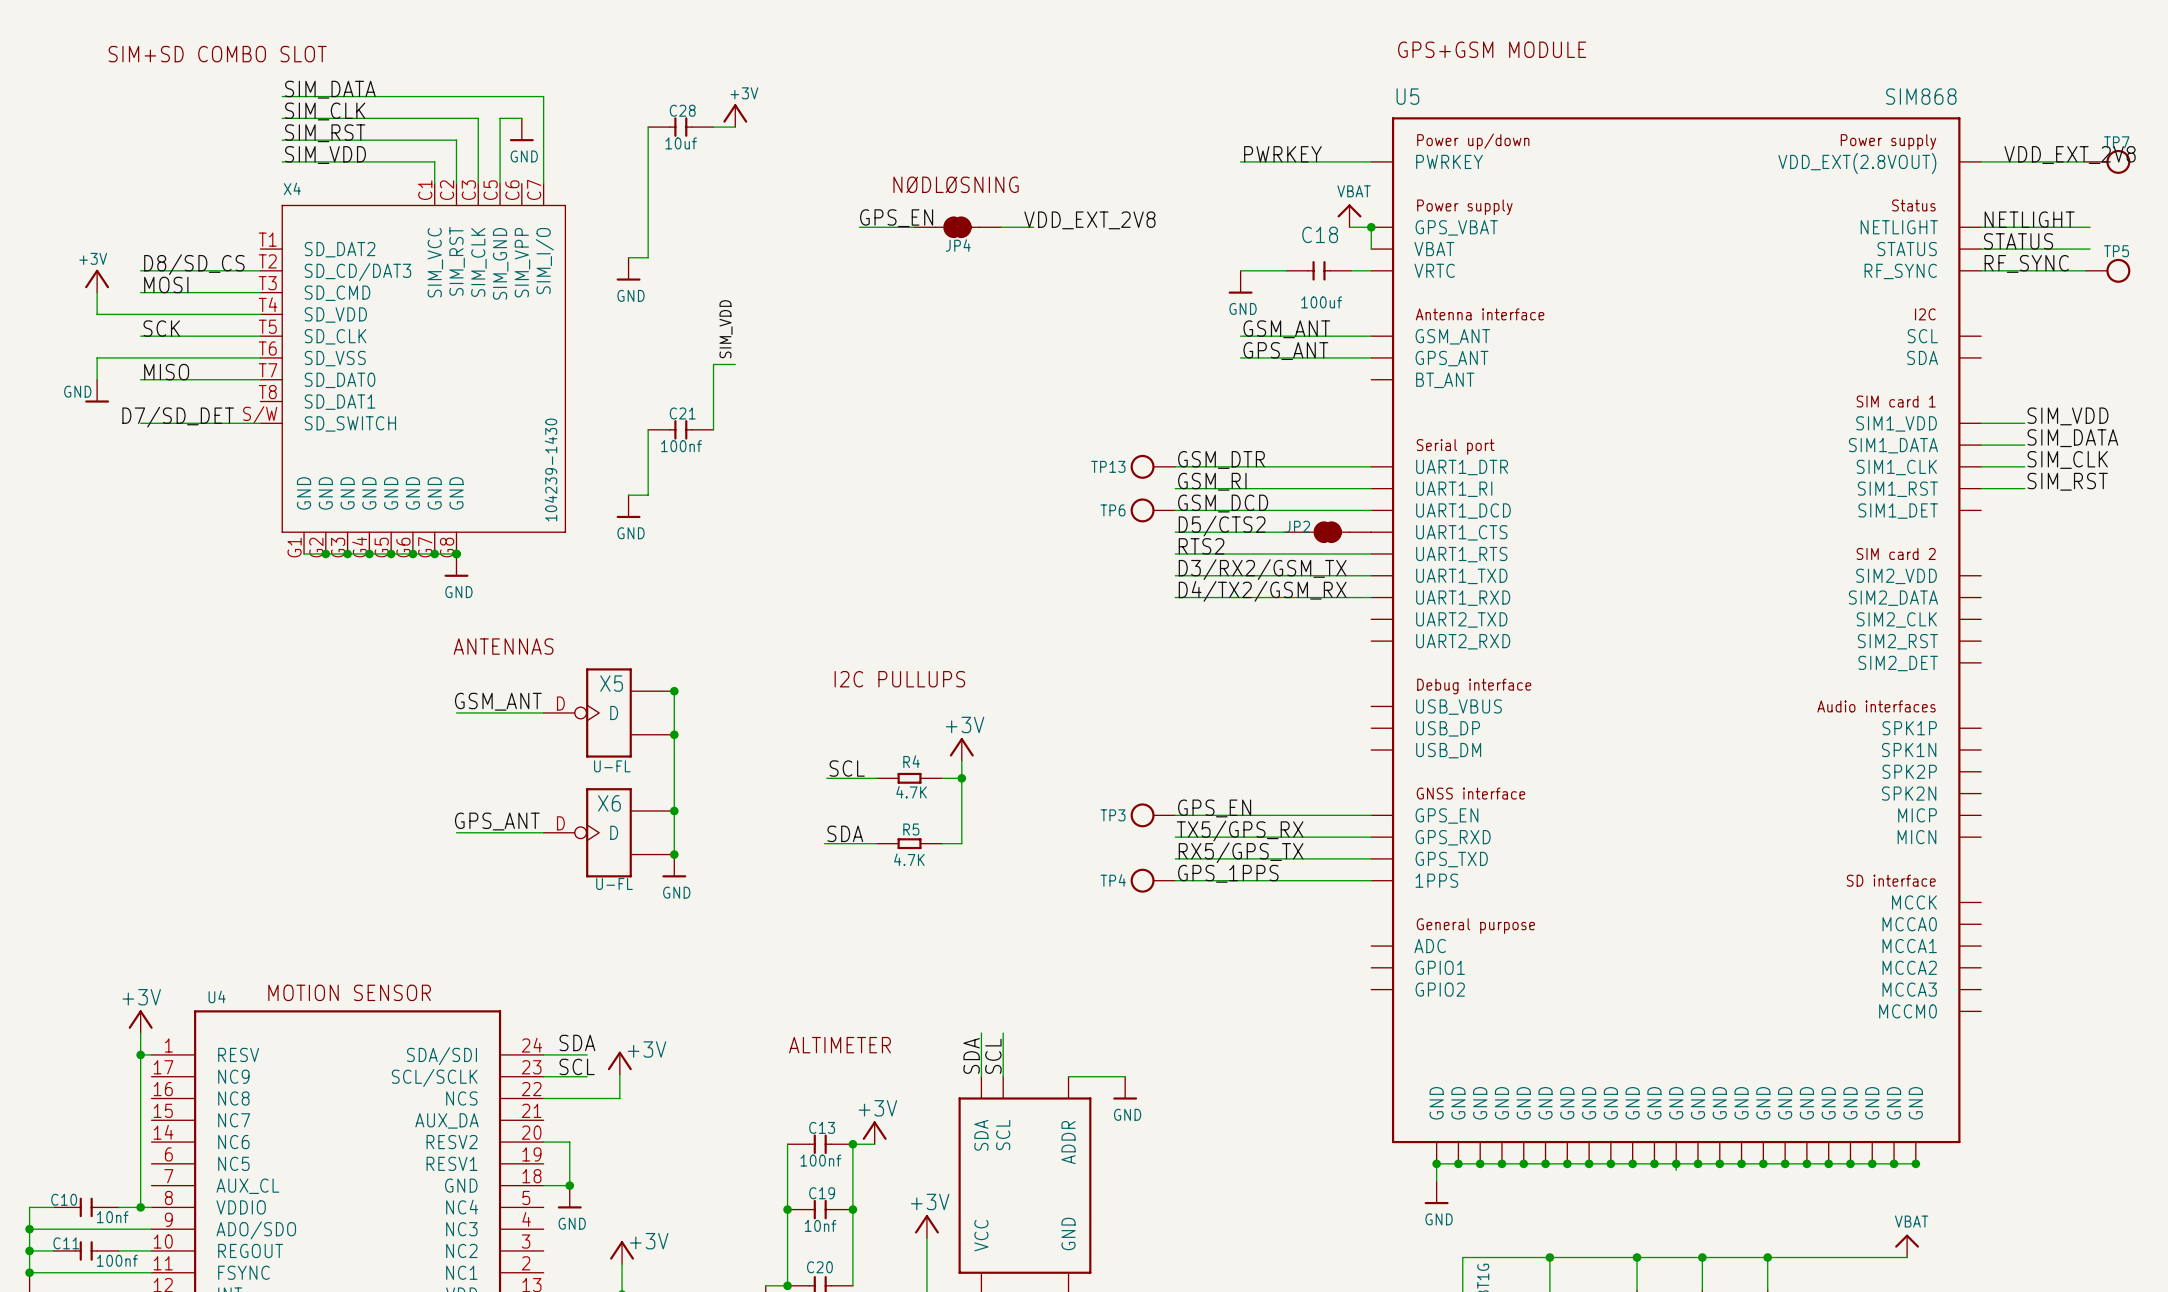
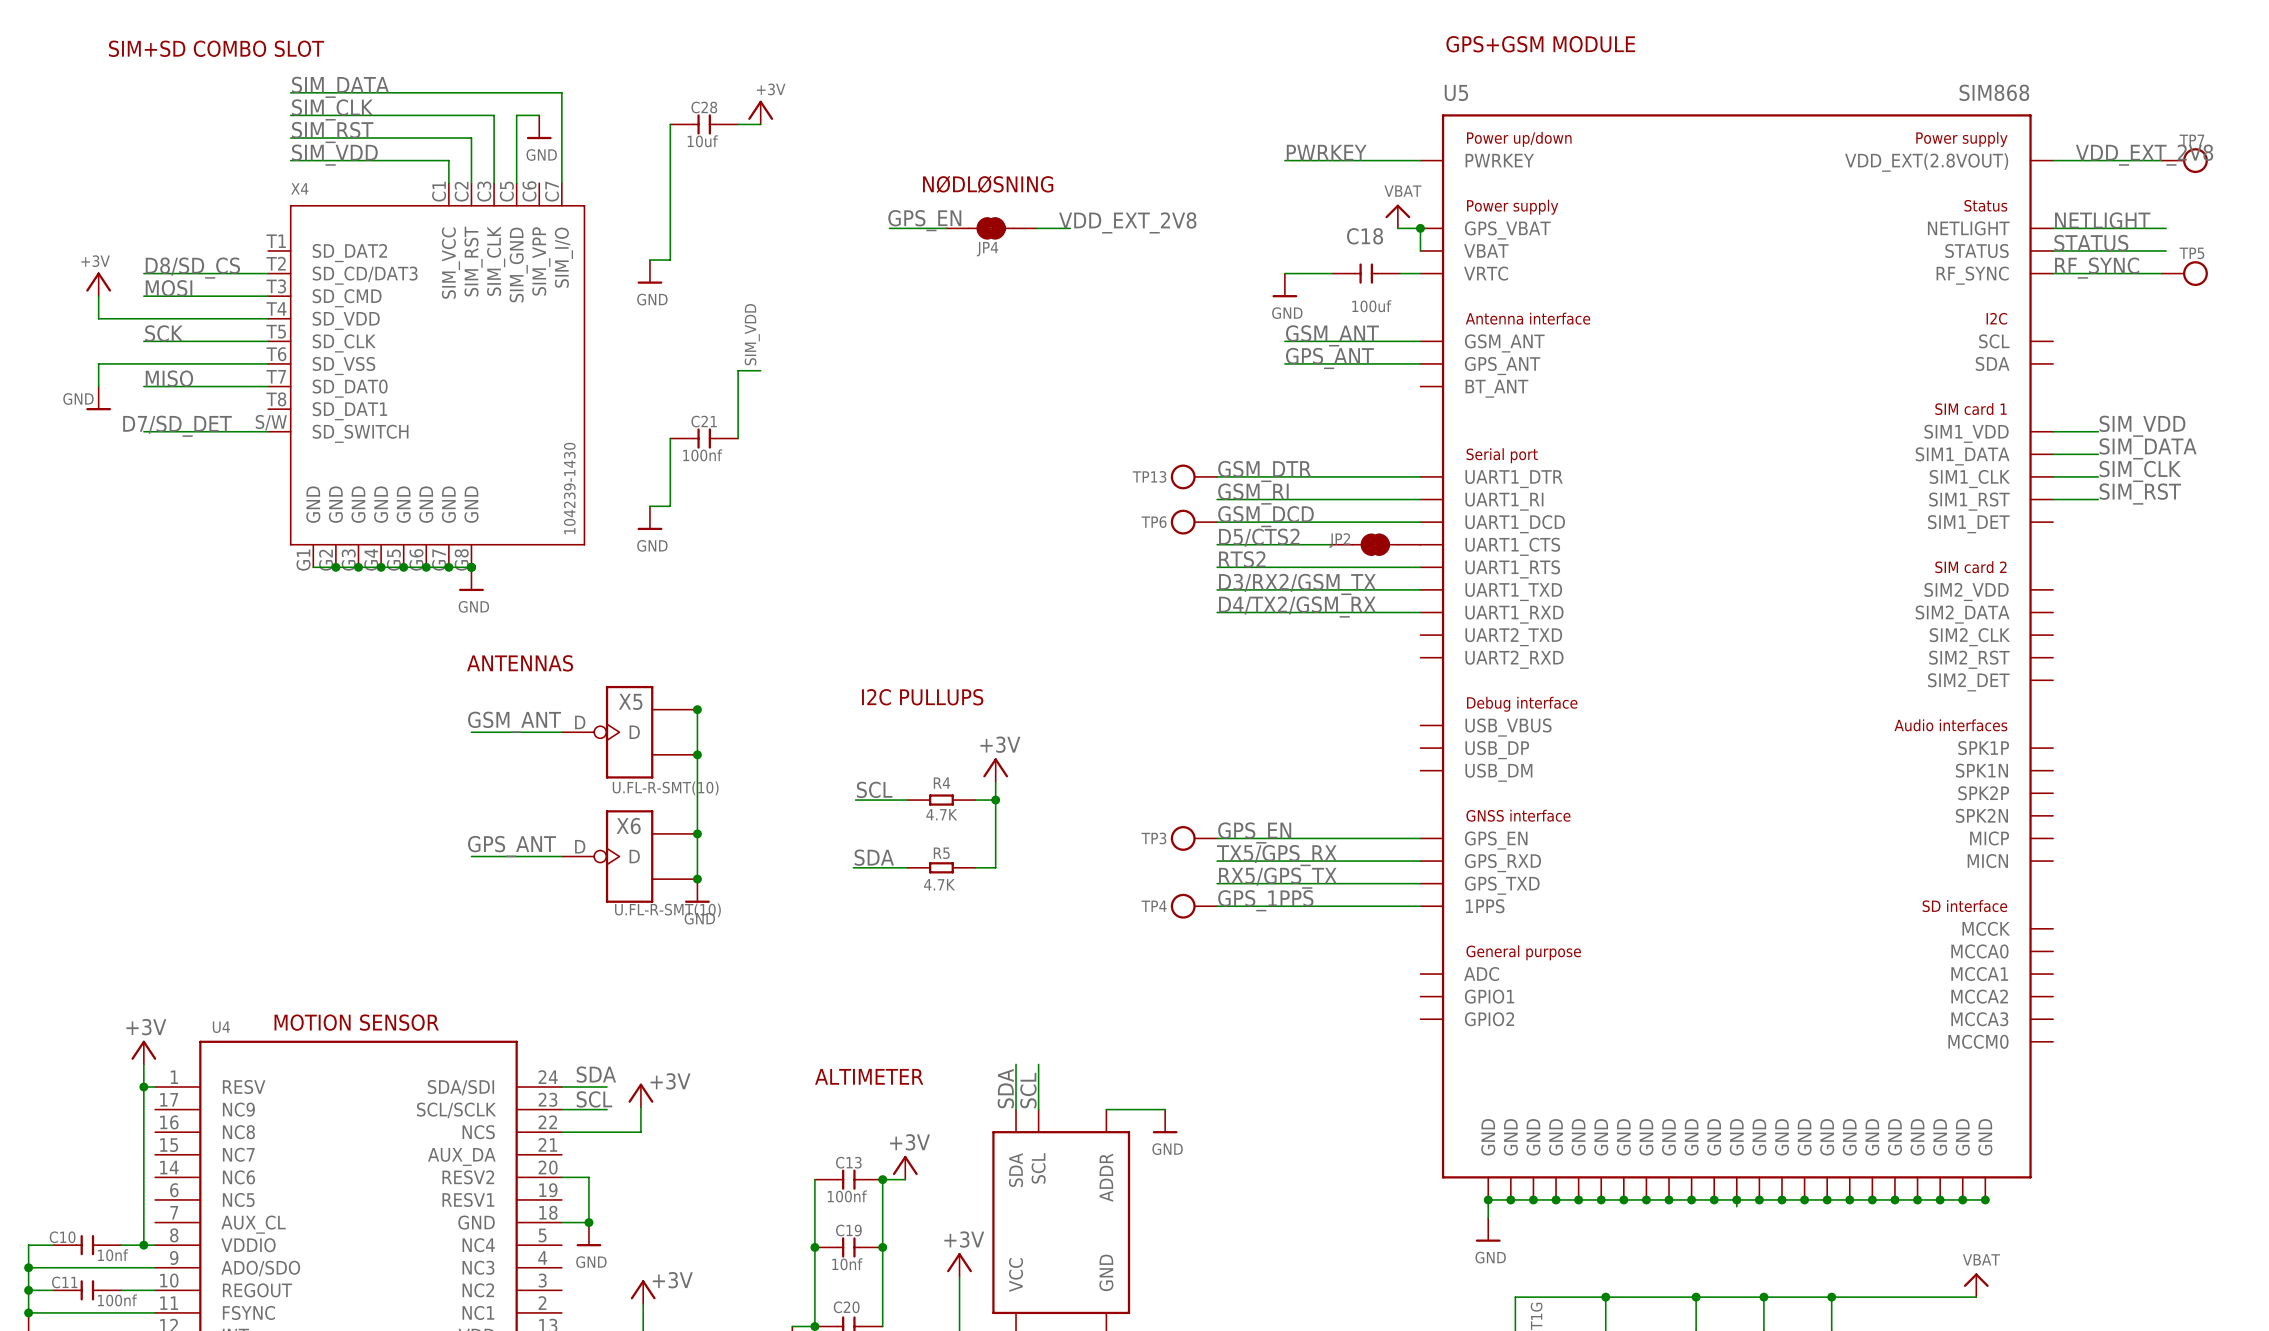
X5 value: U-FL (612, 766) -> U.FL-R-SMT(10) (665, 788)
X6 value: U-FL (614, 883) -> U.FL-R-SMT(10) (667, 910)

